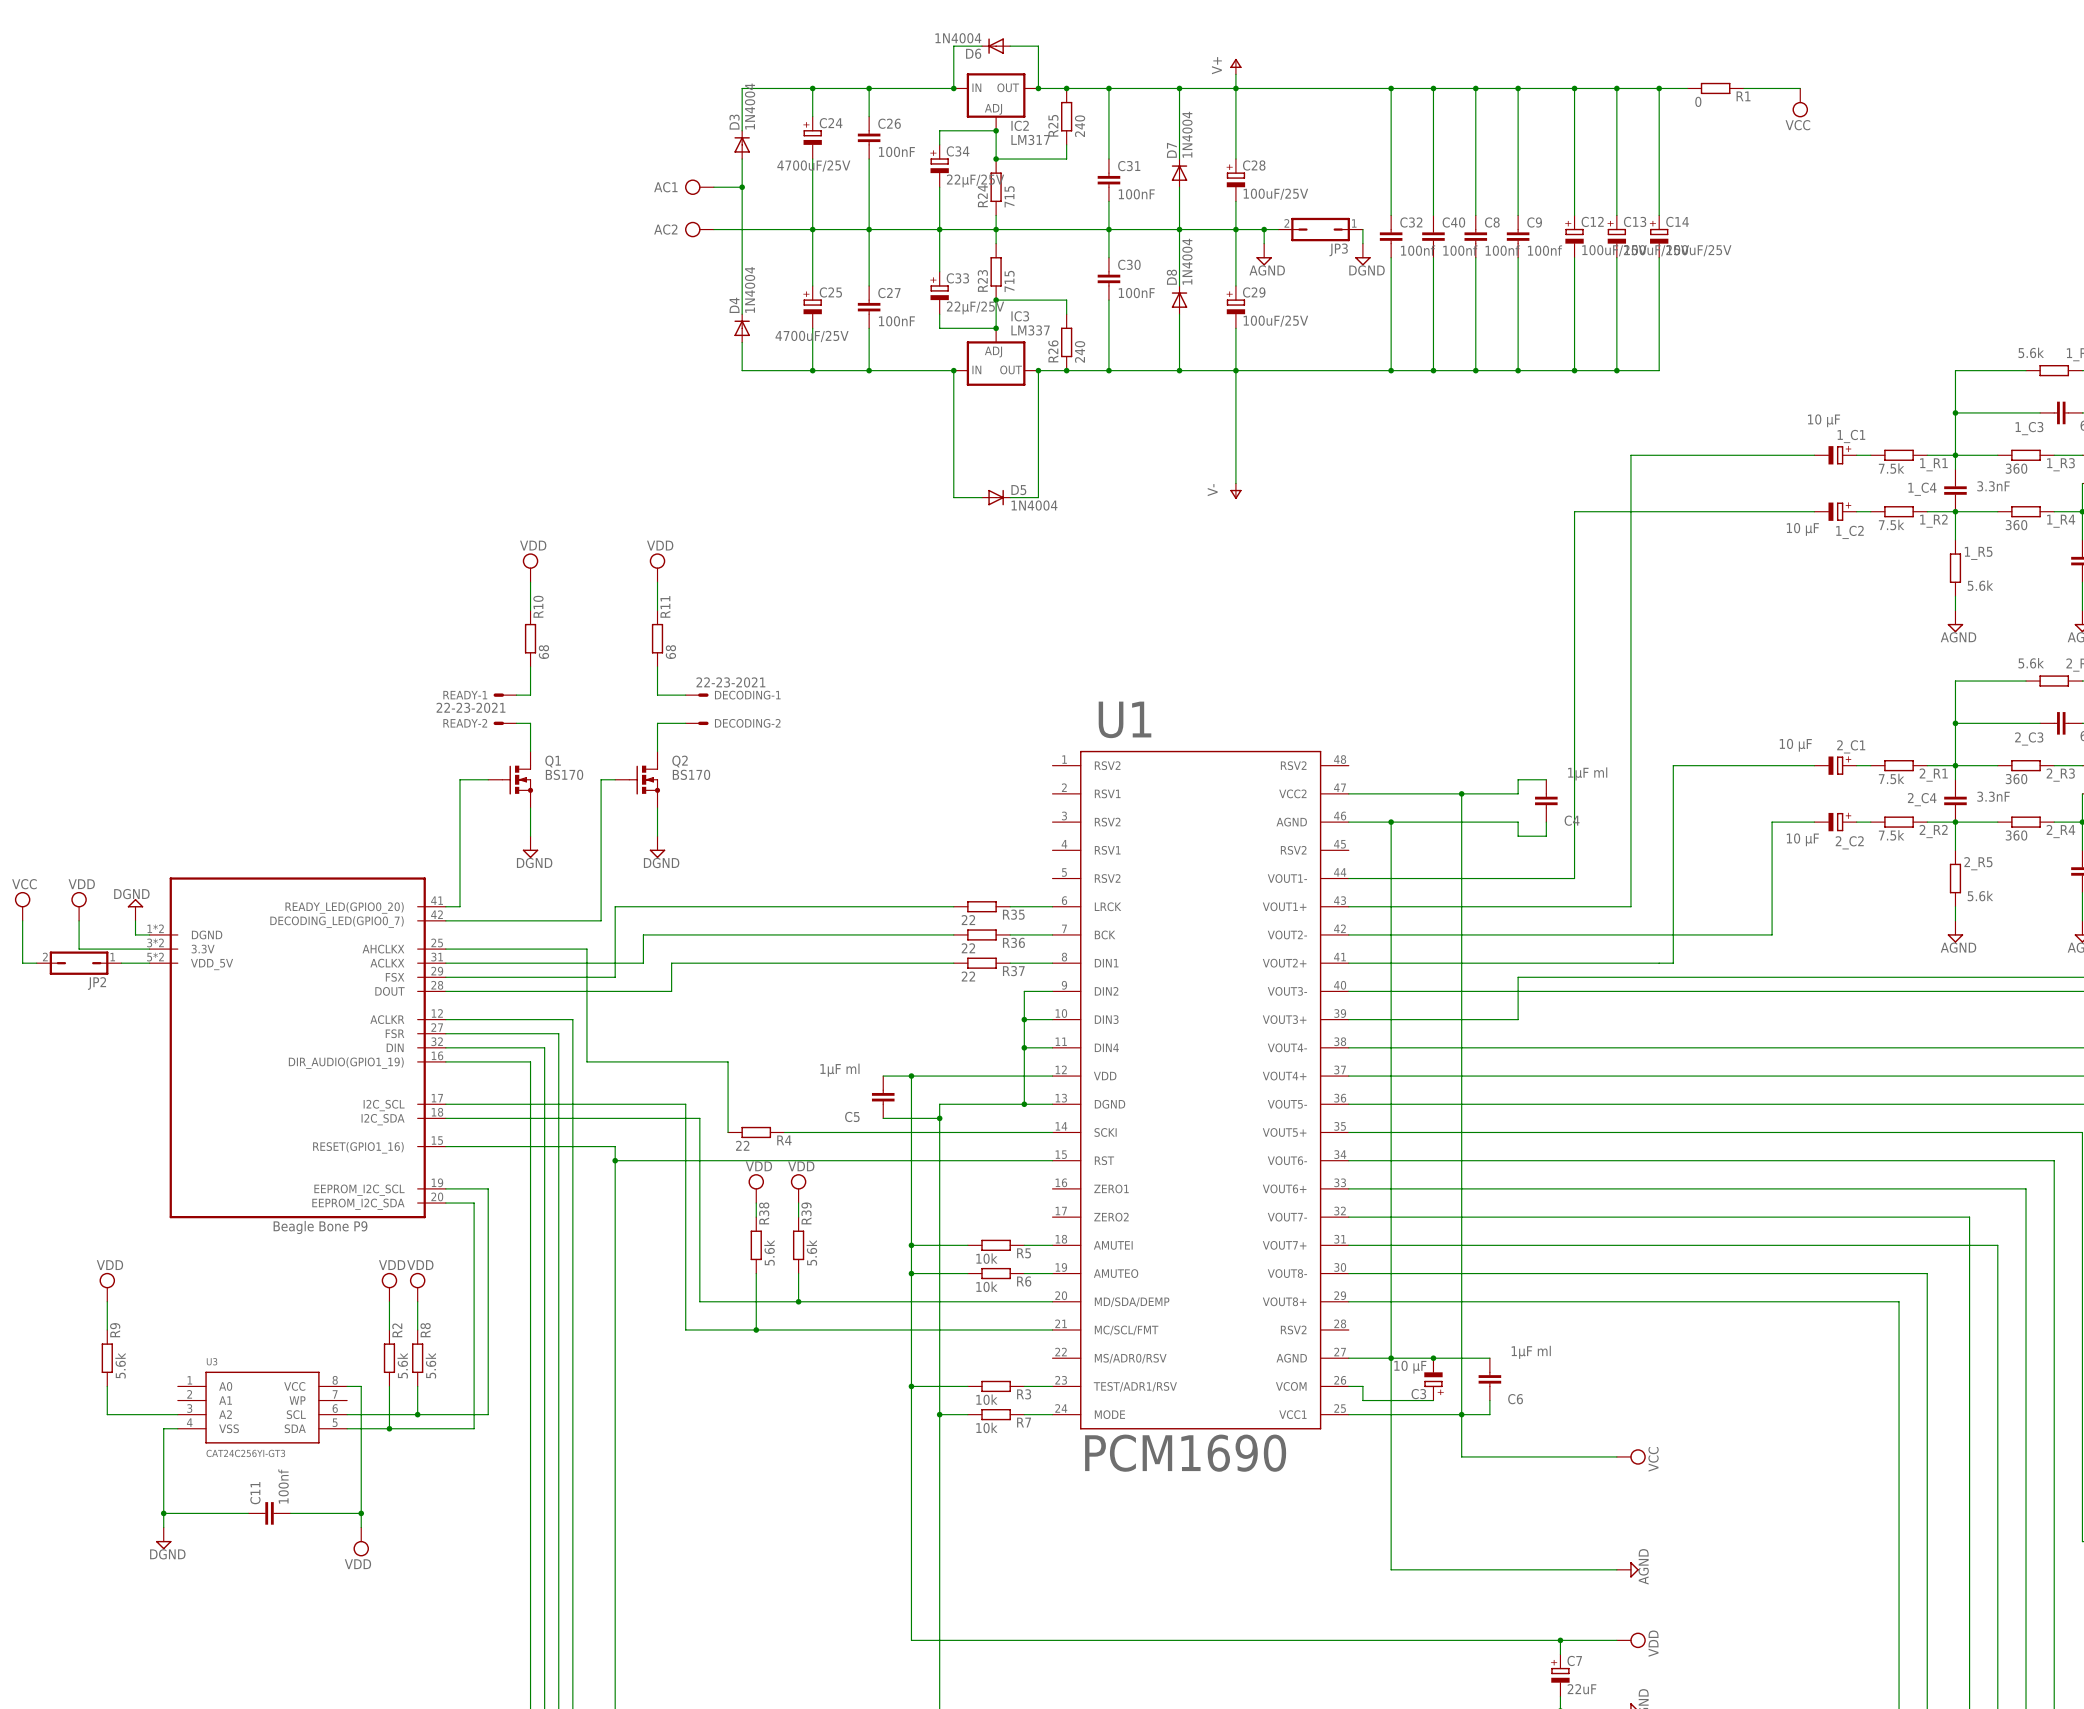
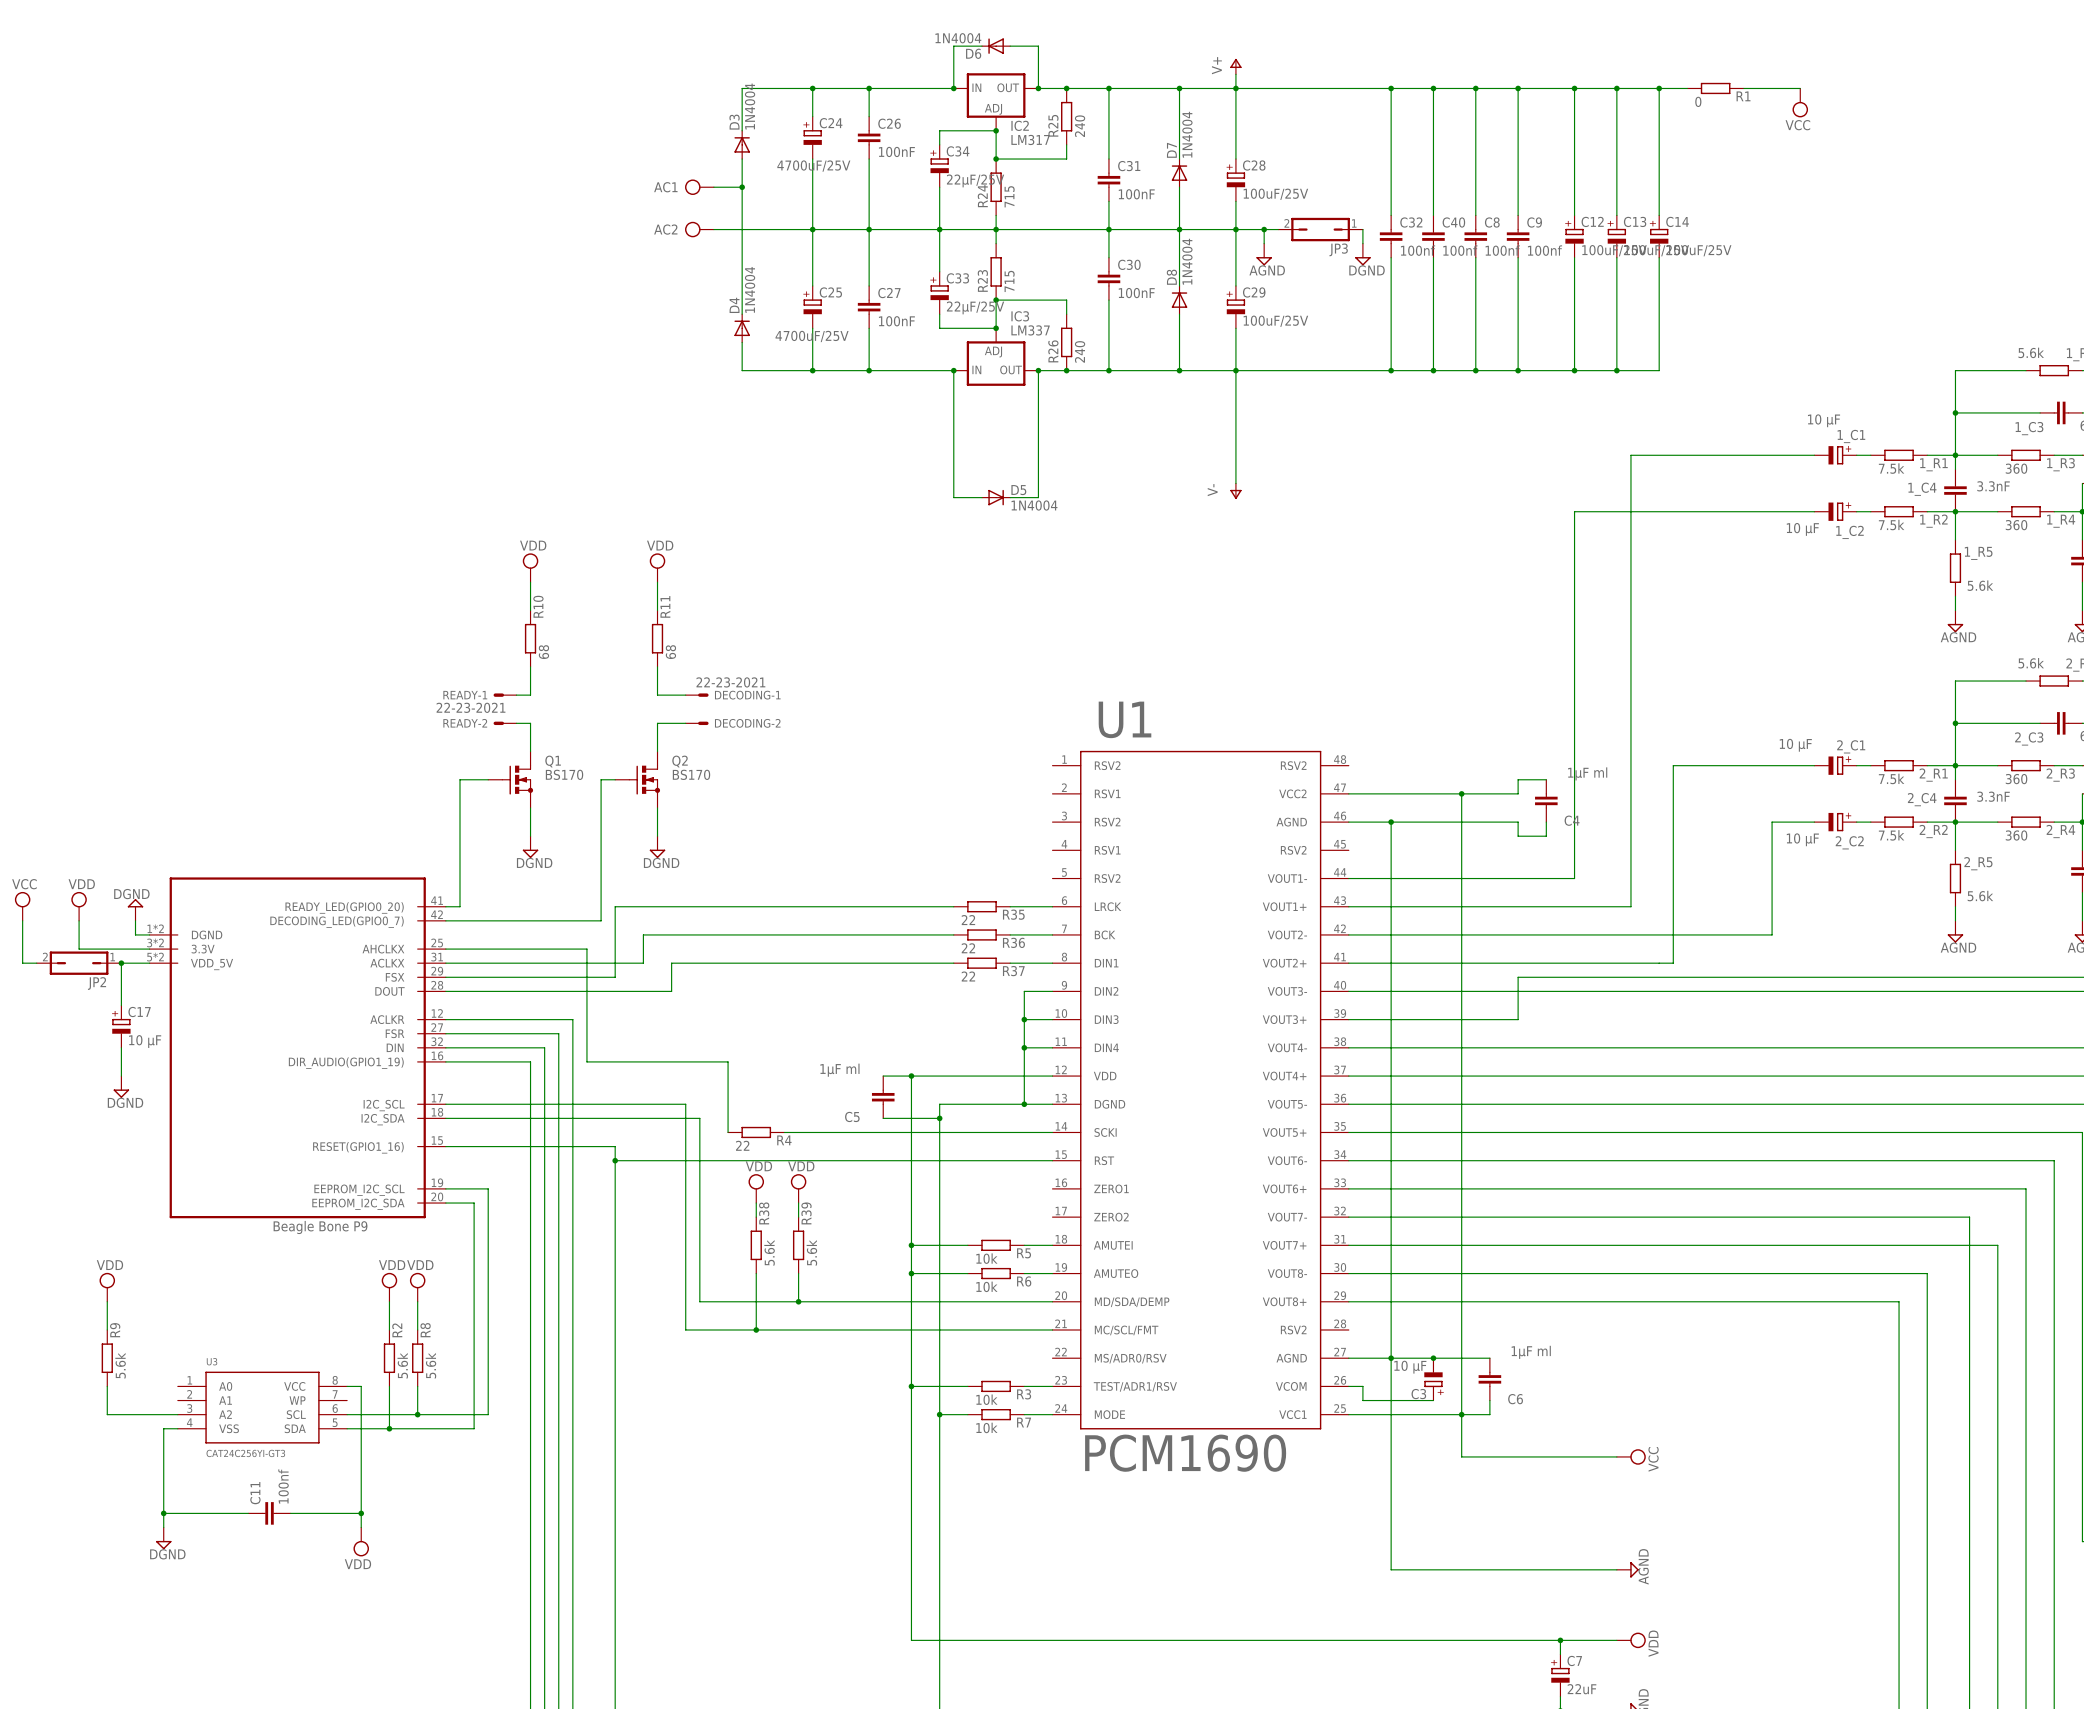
wire: none -> (121, 963) (121, 1005)
junction: none -> (121, 963)
C17: none -> 10 µF (121, 1026)
wire: none -> (121, 1047) (121, 1076)
power symbol: none -> DGND (121, 1086)

